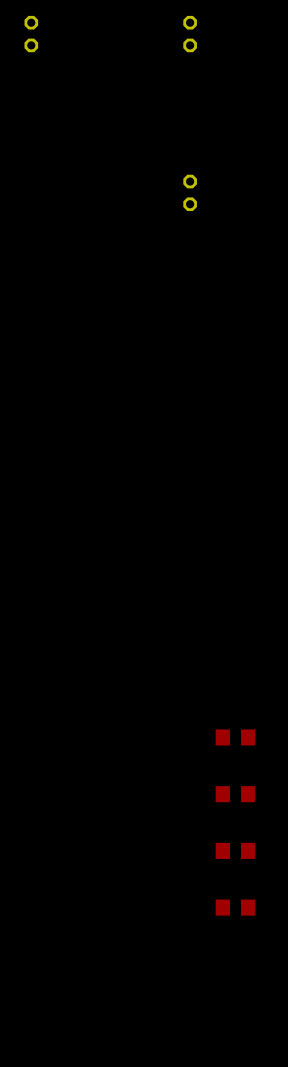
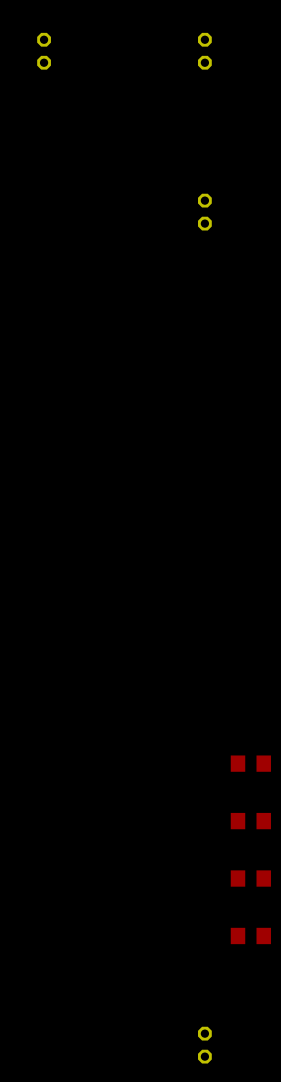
part: none -> (204, 1045)

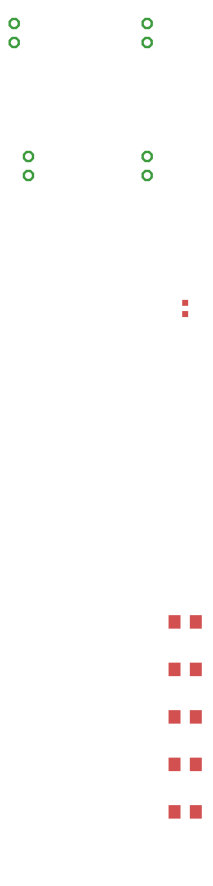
part: none -> (28, 165)
part: none -> (185, 308)
part: none -> (185, 811)
part: (204, 1045) -> none

